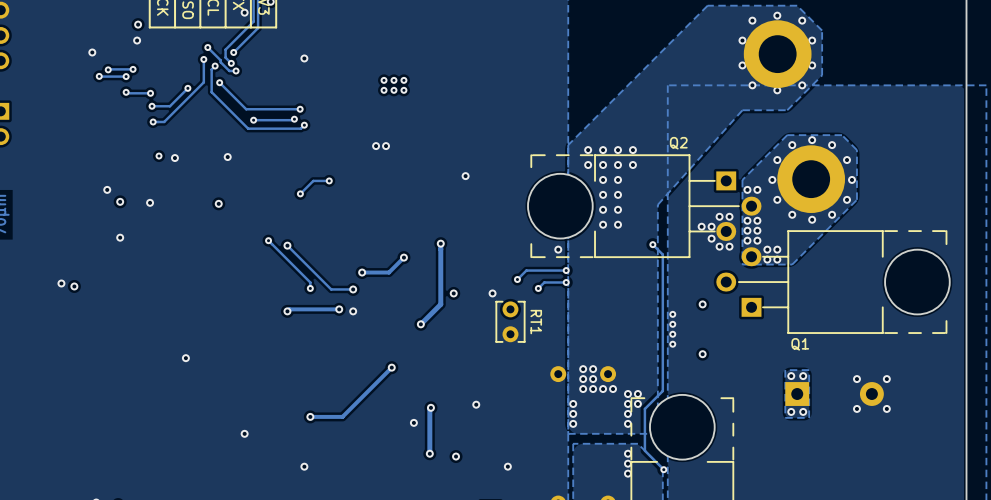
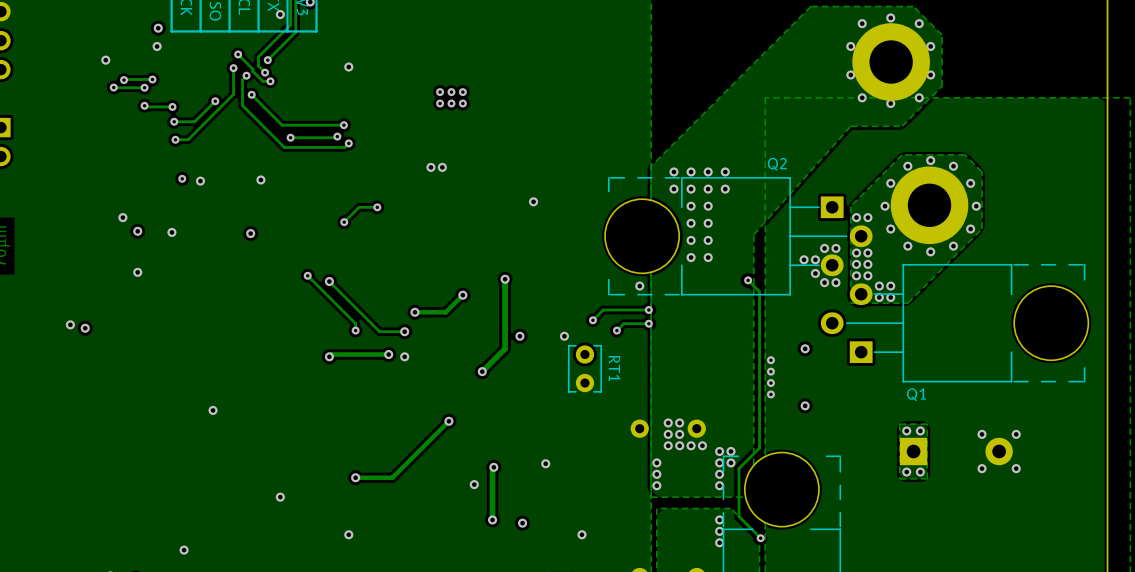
via: none -> (184, 550)

